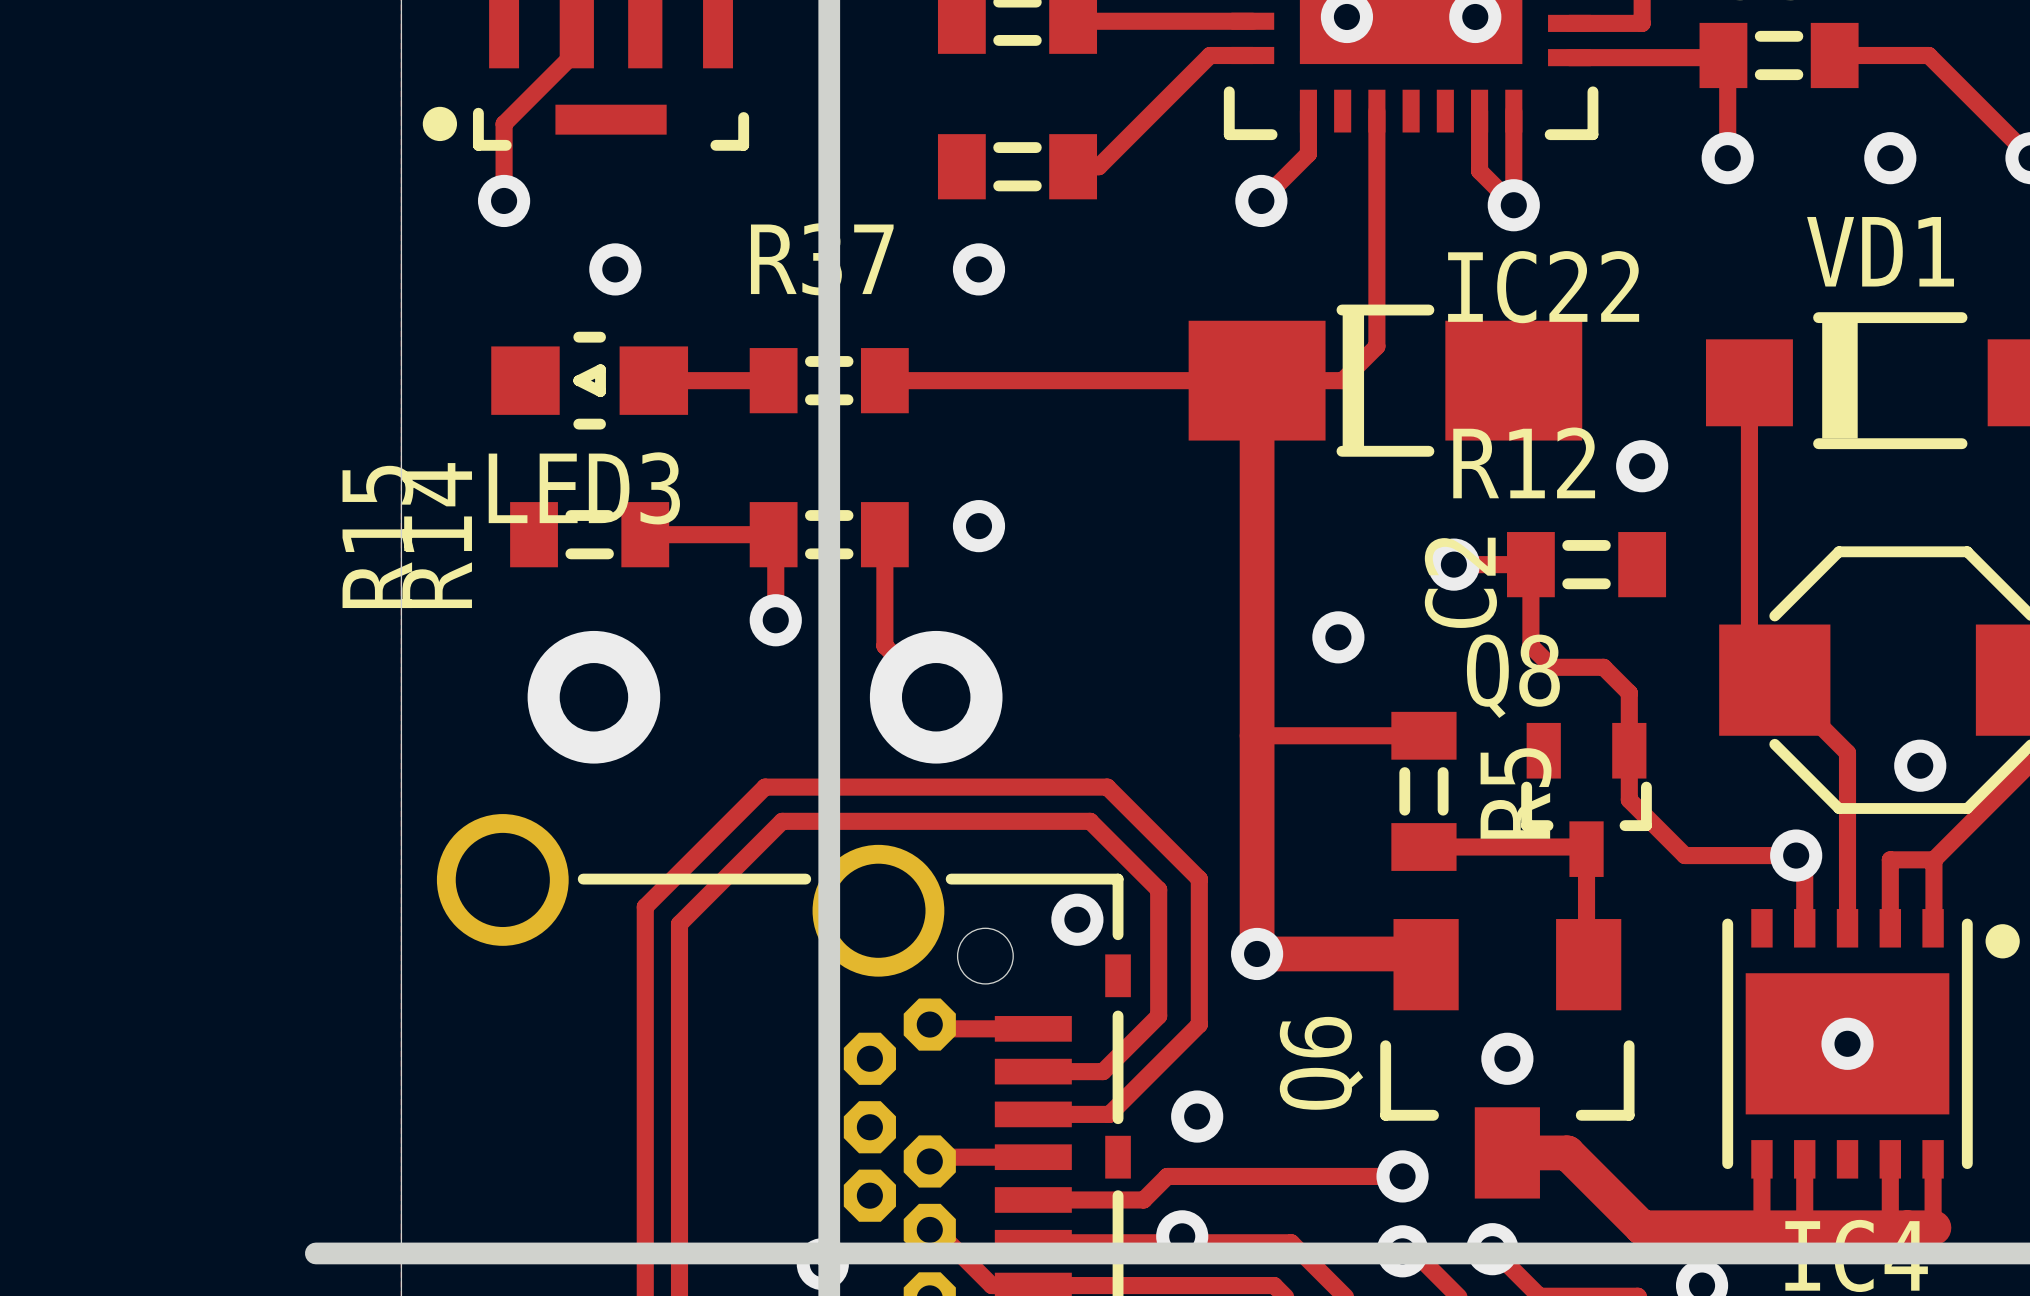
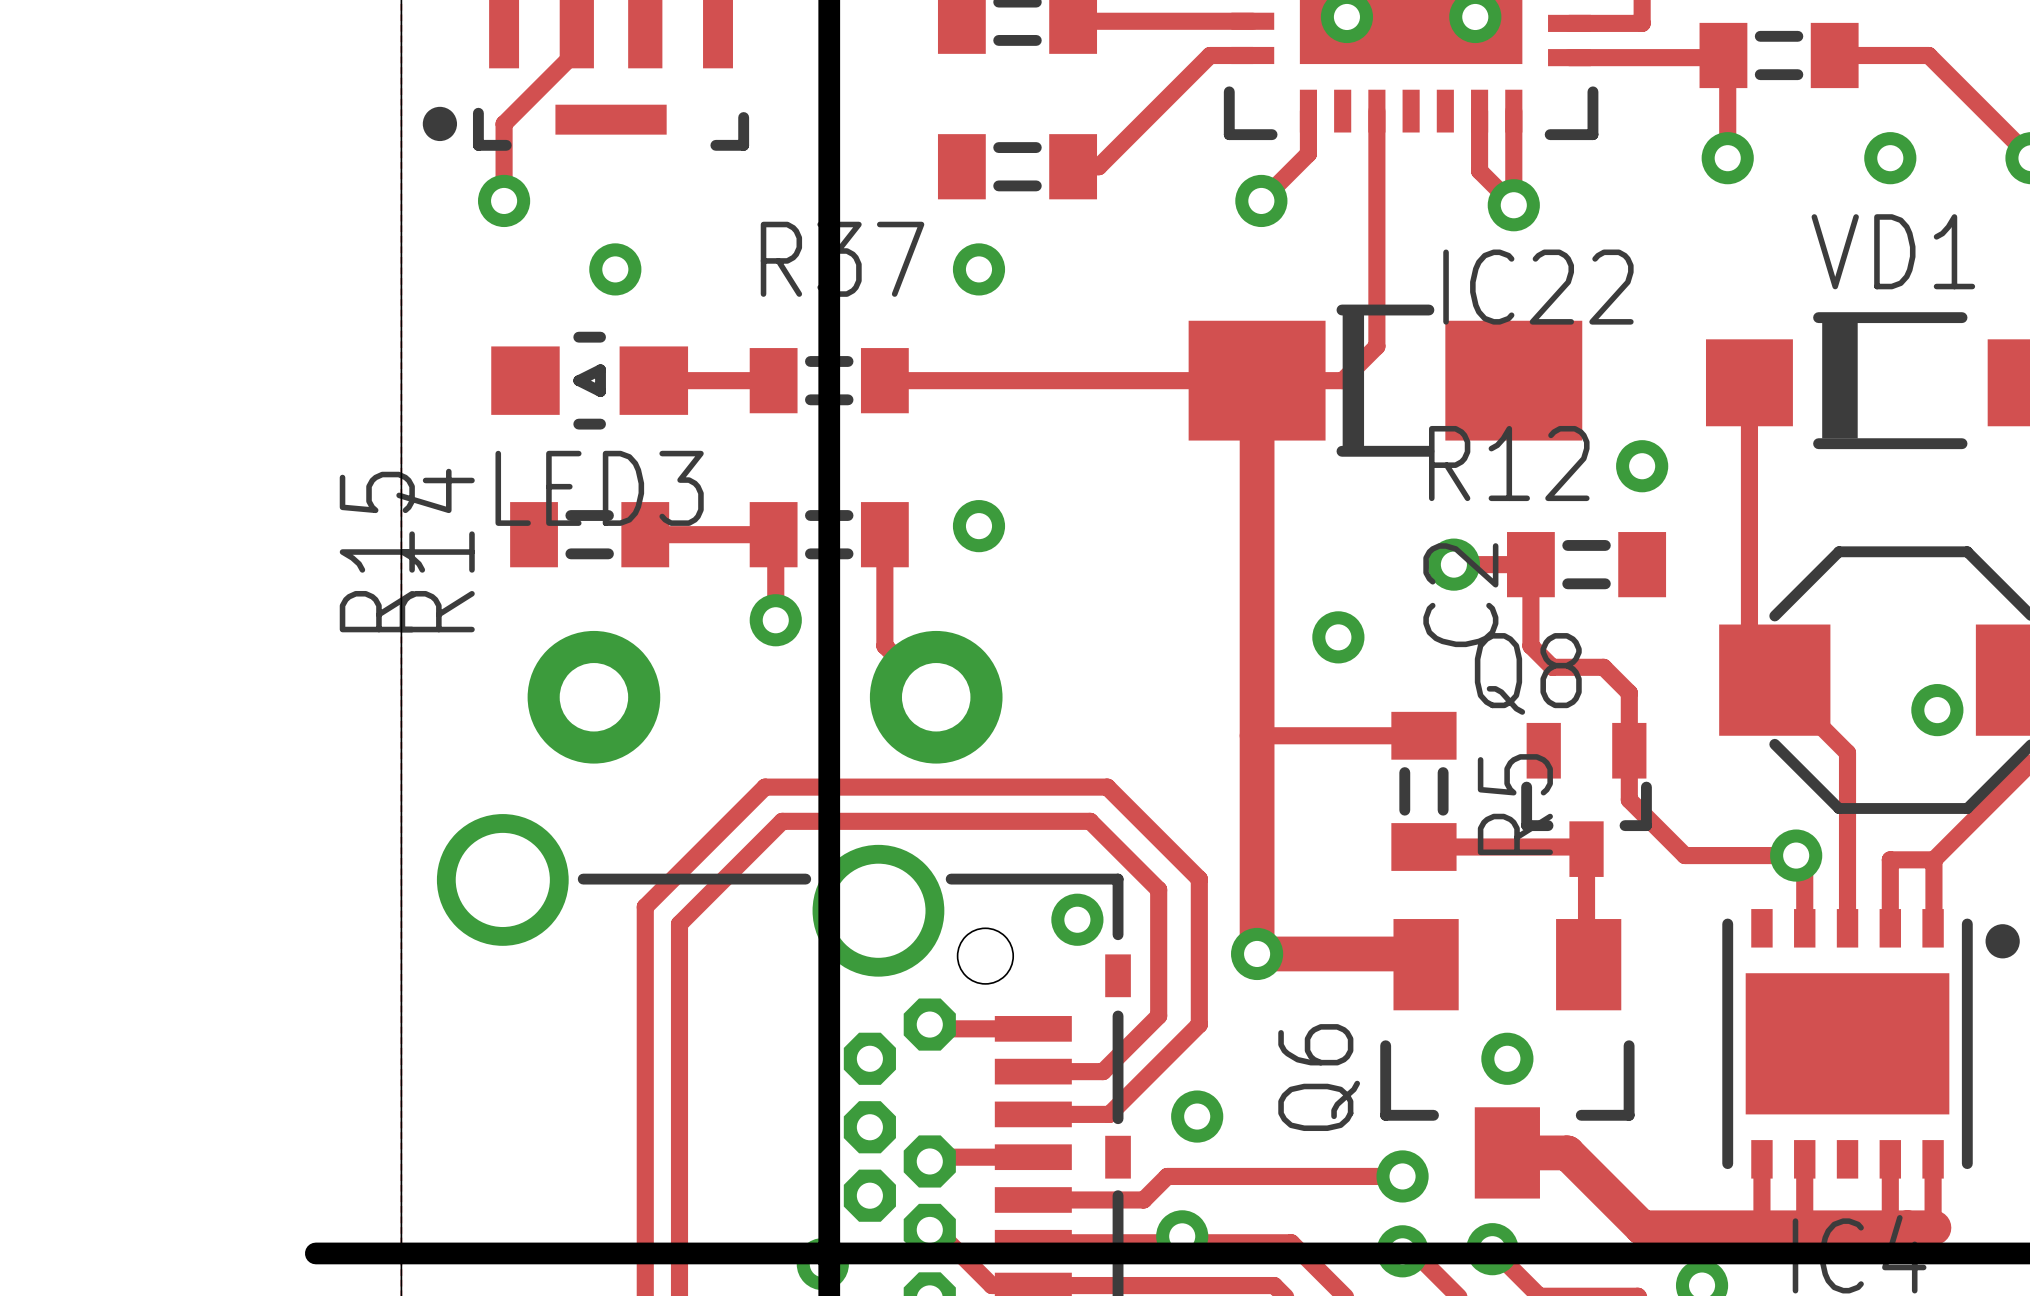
via position: (1920, 765) -> (1937, 710)
via: (1847, 1043) -> none

